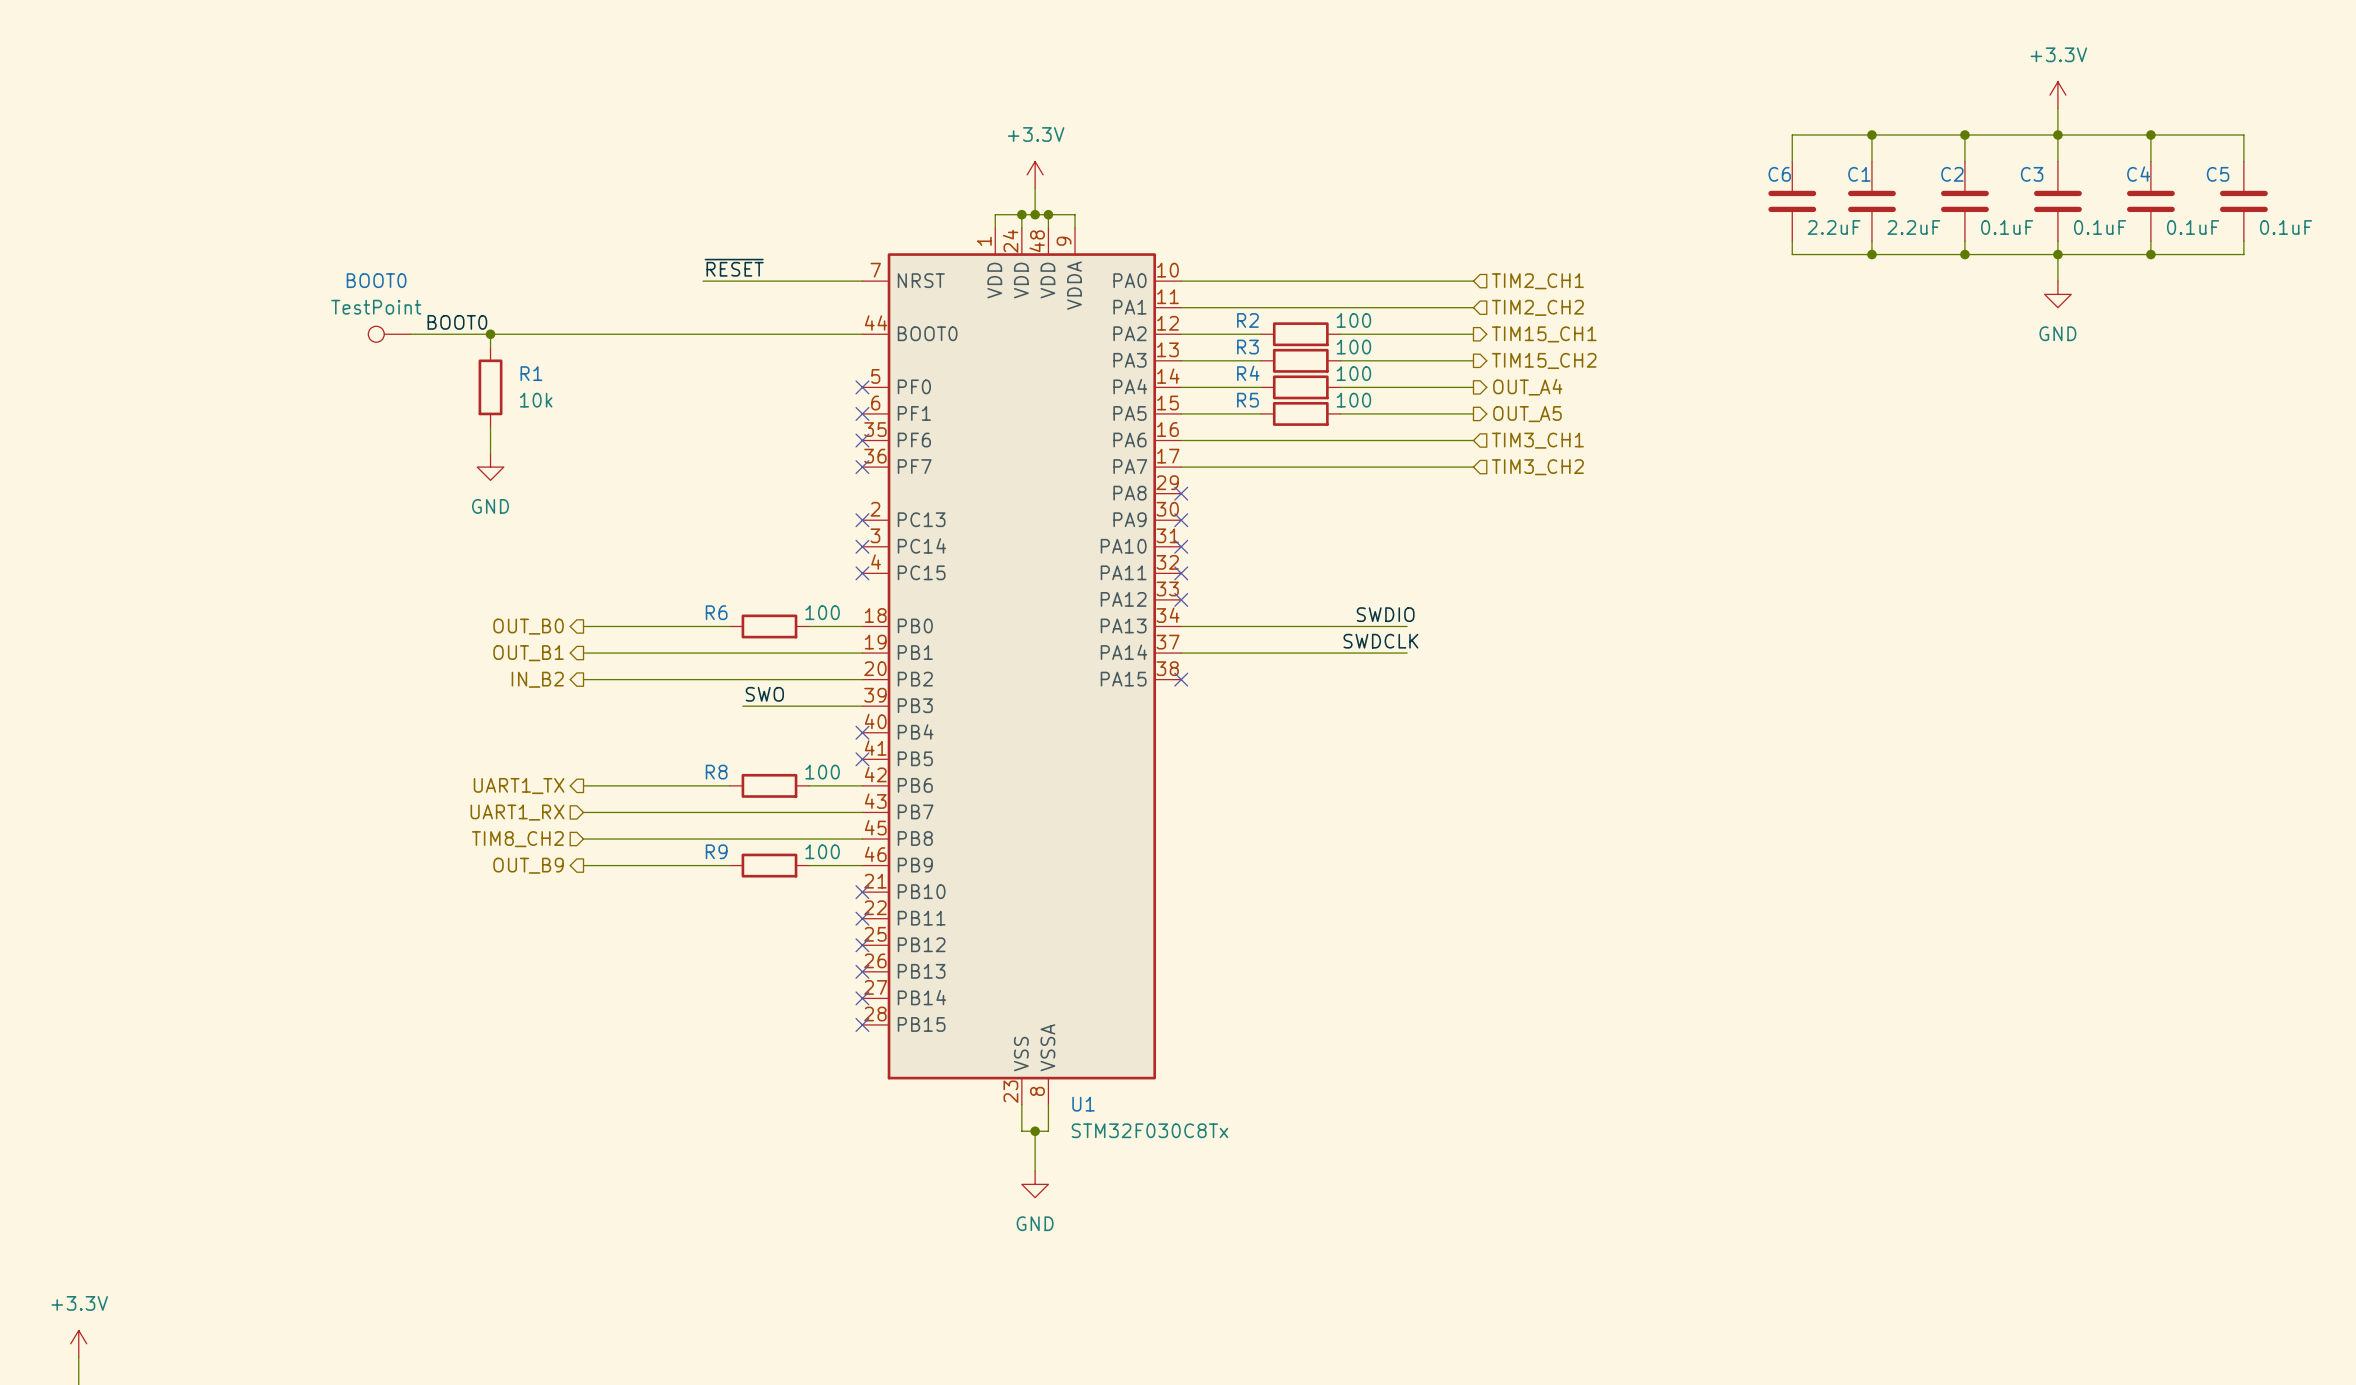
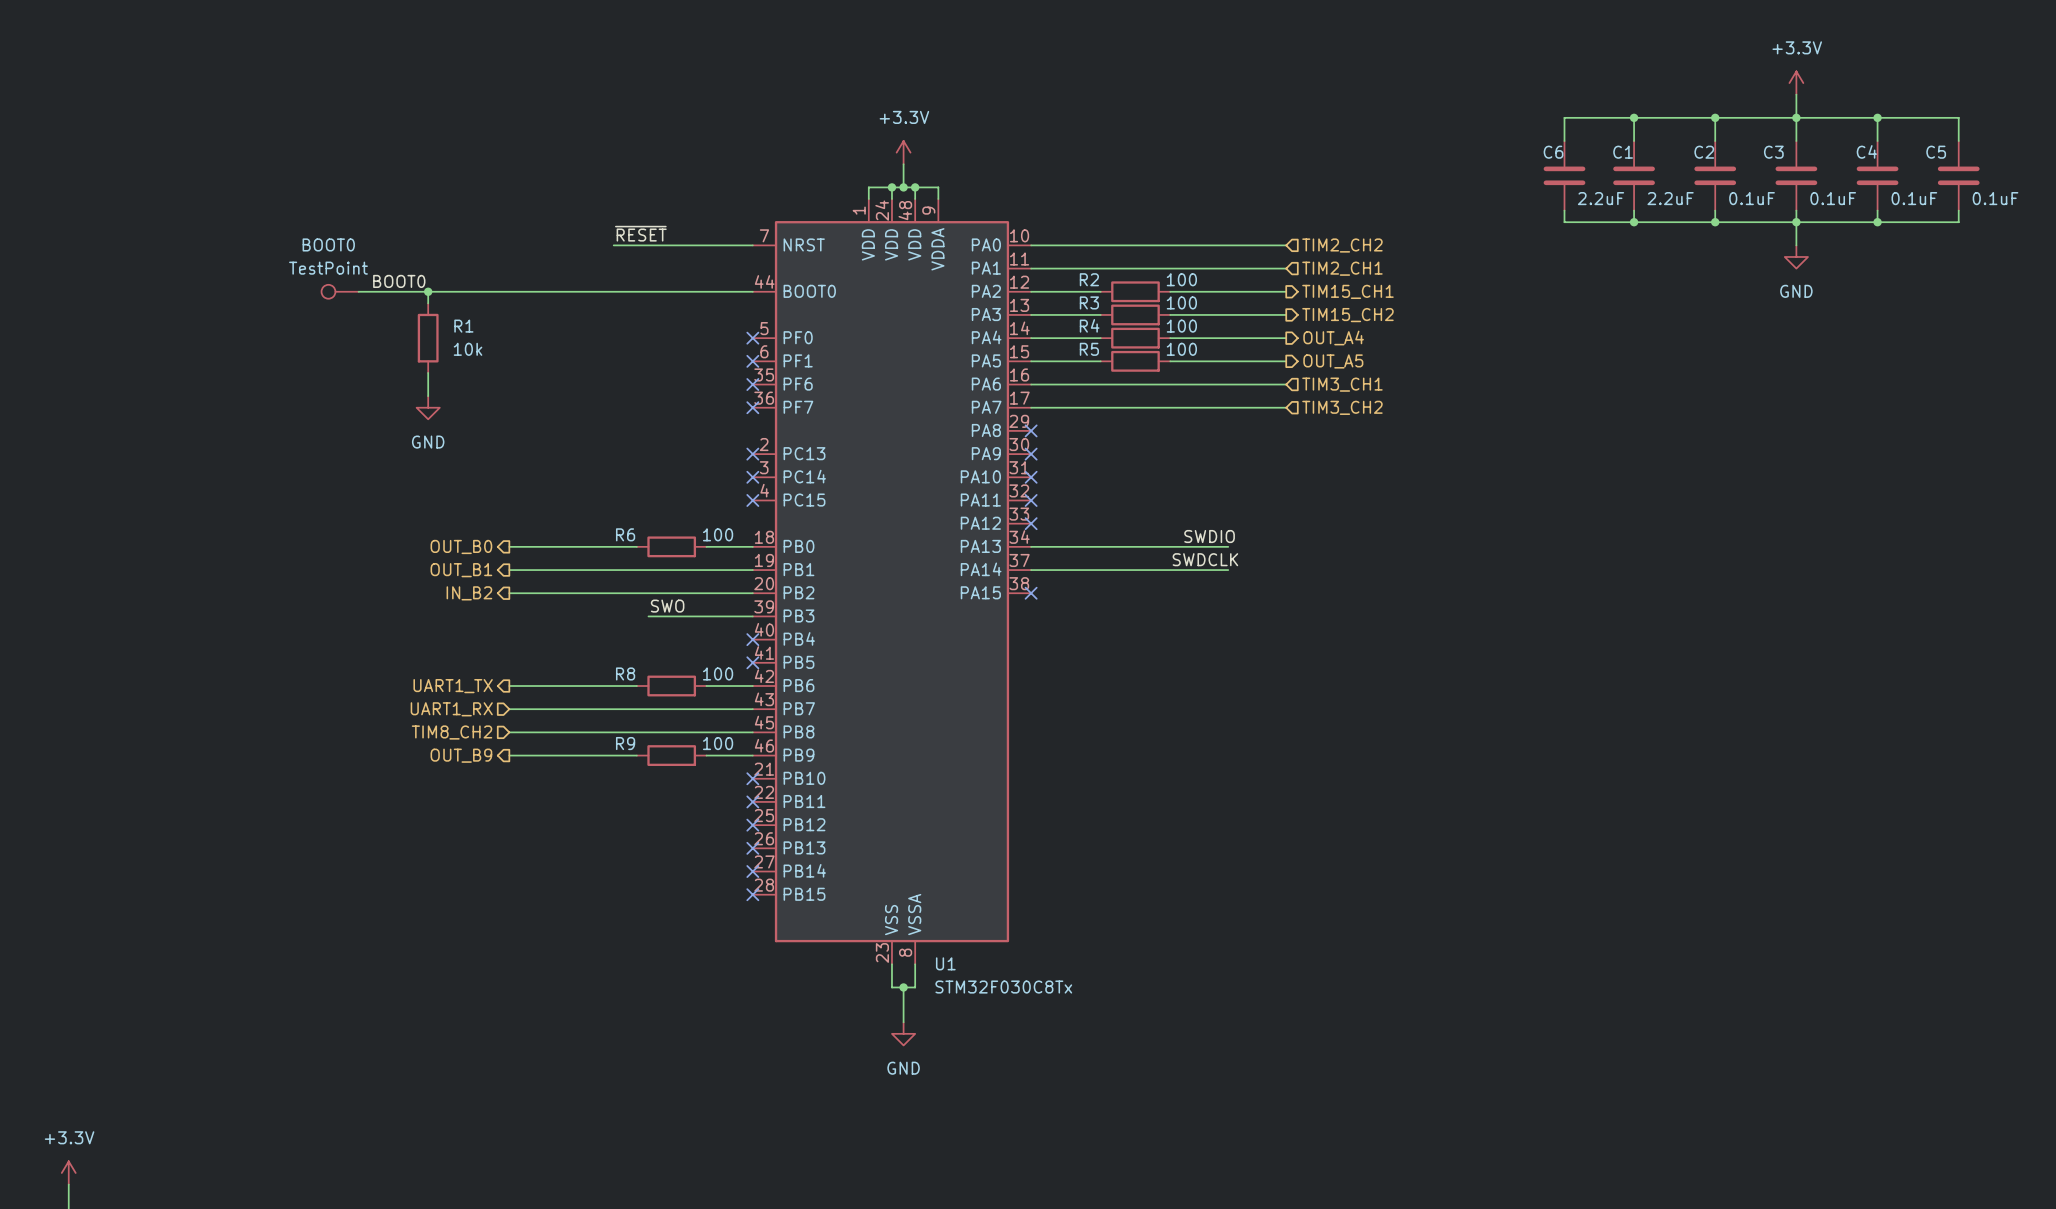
hierarchical label: TIM2_CH1 (1537, 281) -> TIM2_CH2 (1342, 245)
hierarchical label: TIM2_CH2 (1537, 307) -> TIM2_CH1 (1342, 268)

